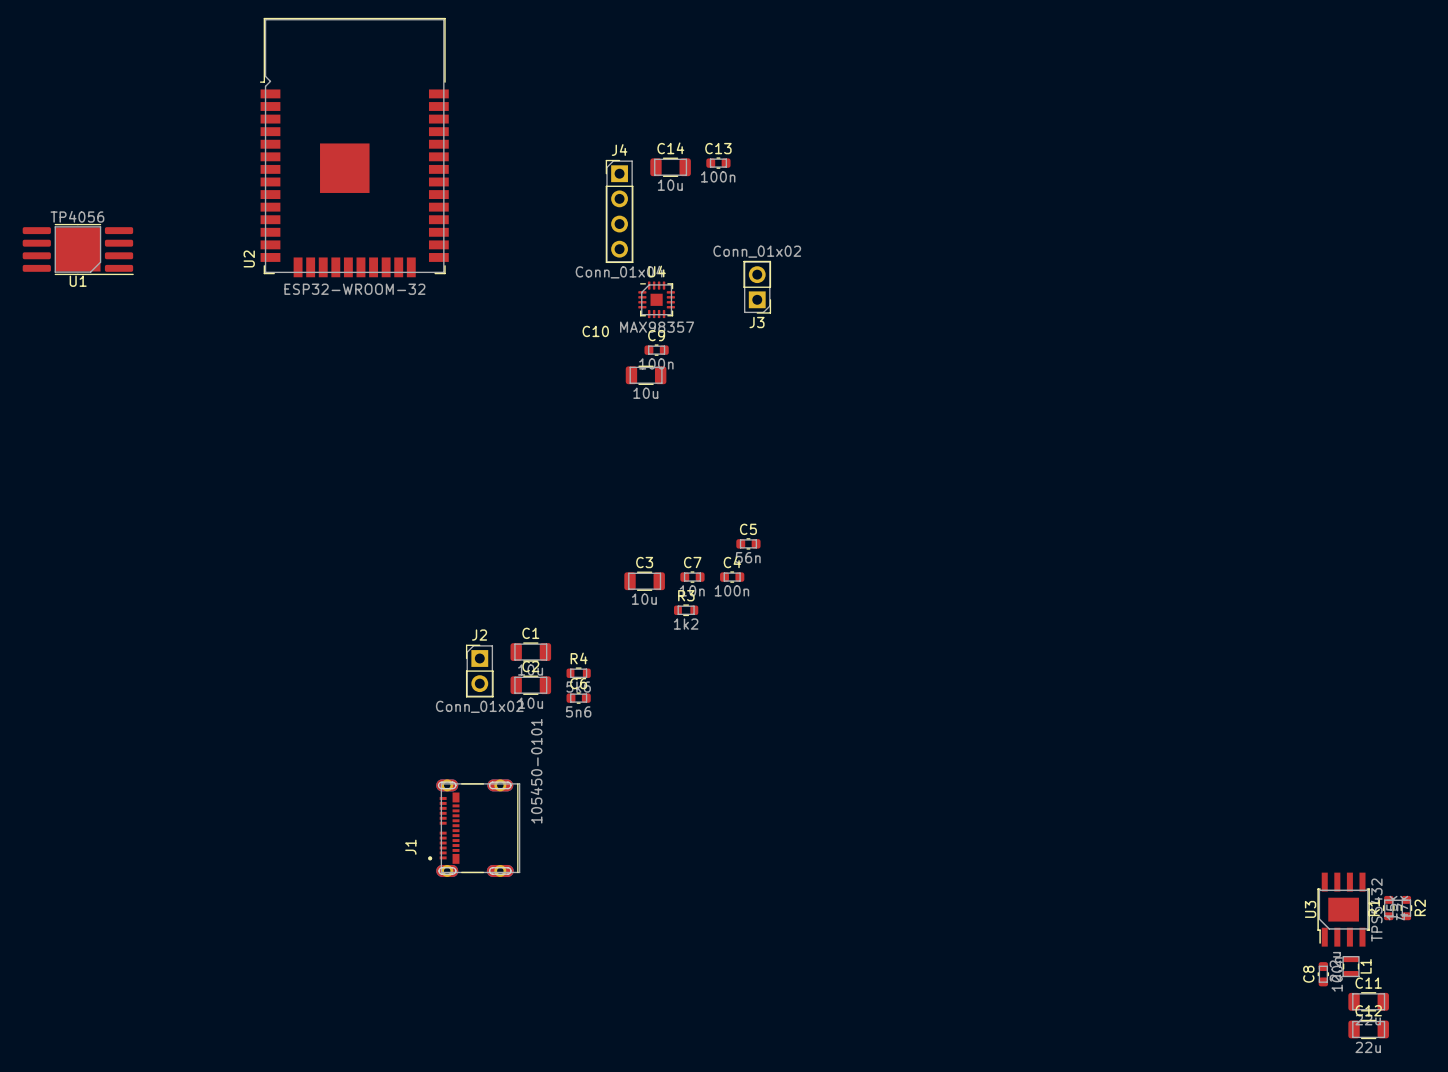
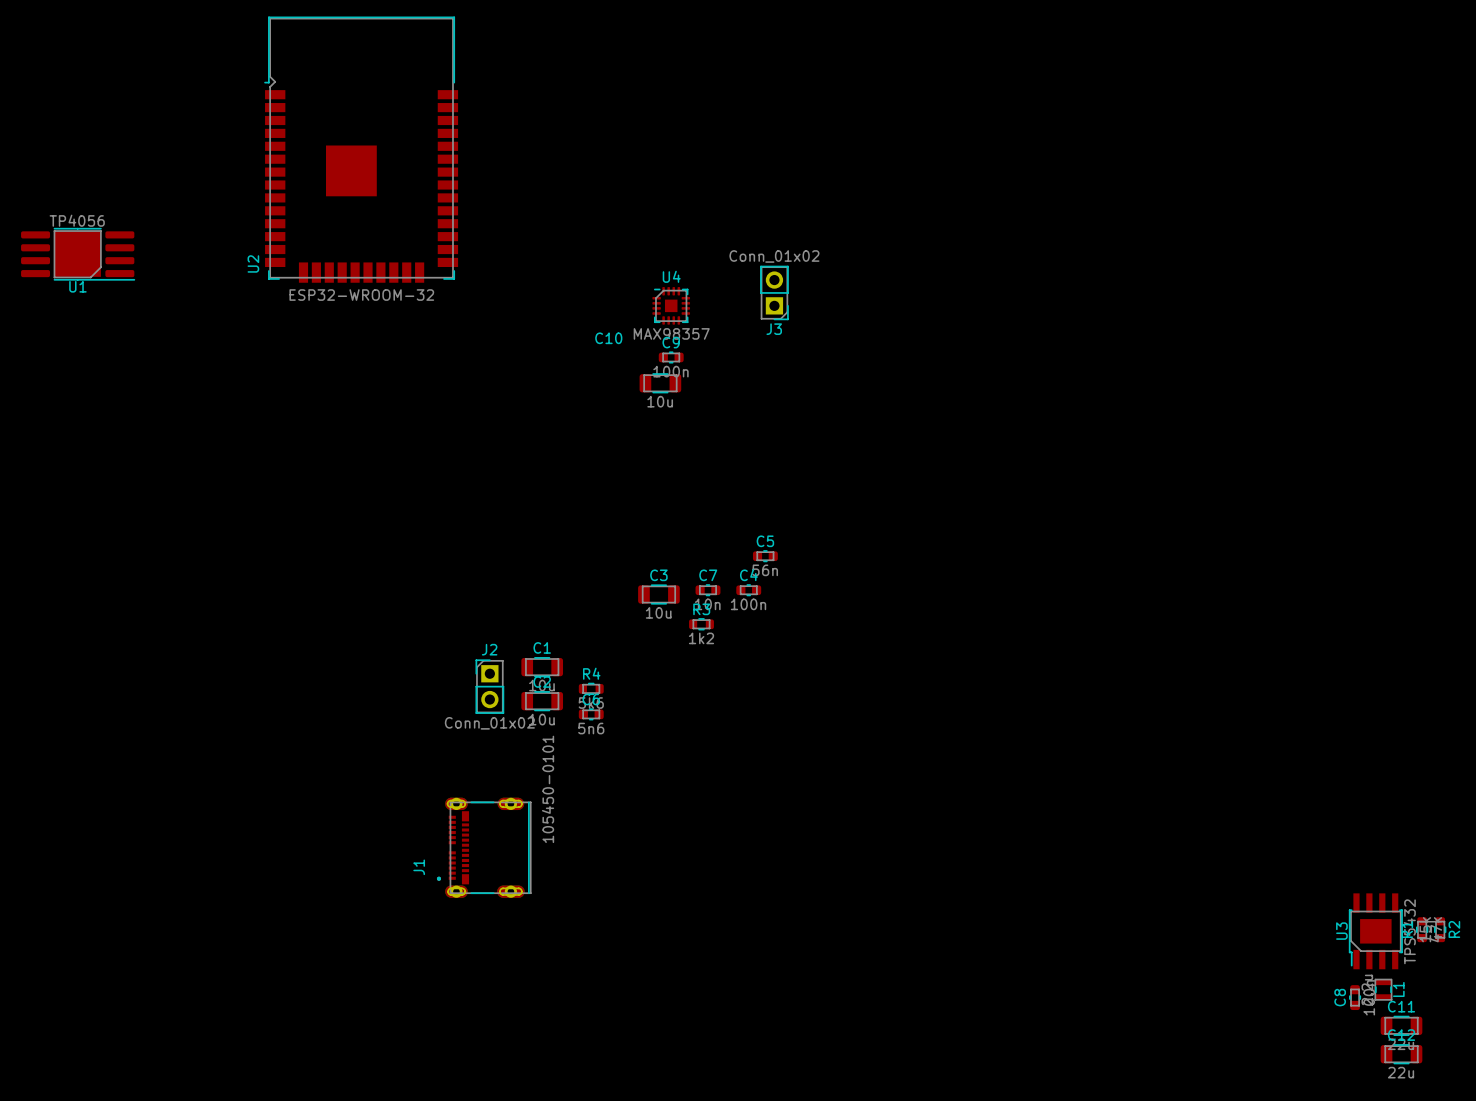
C13: 100n (718, 163) -> none
C14: 10u (670, 167) -> none
J4: Conn_01x04 (619, 211) -> none

